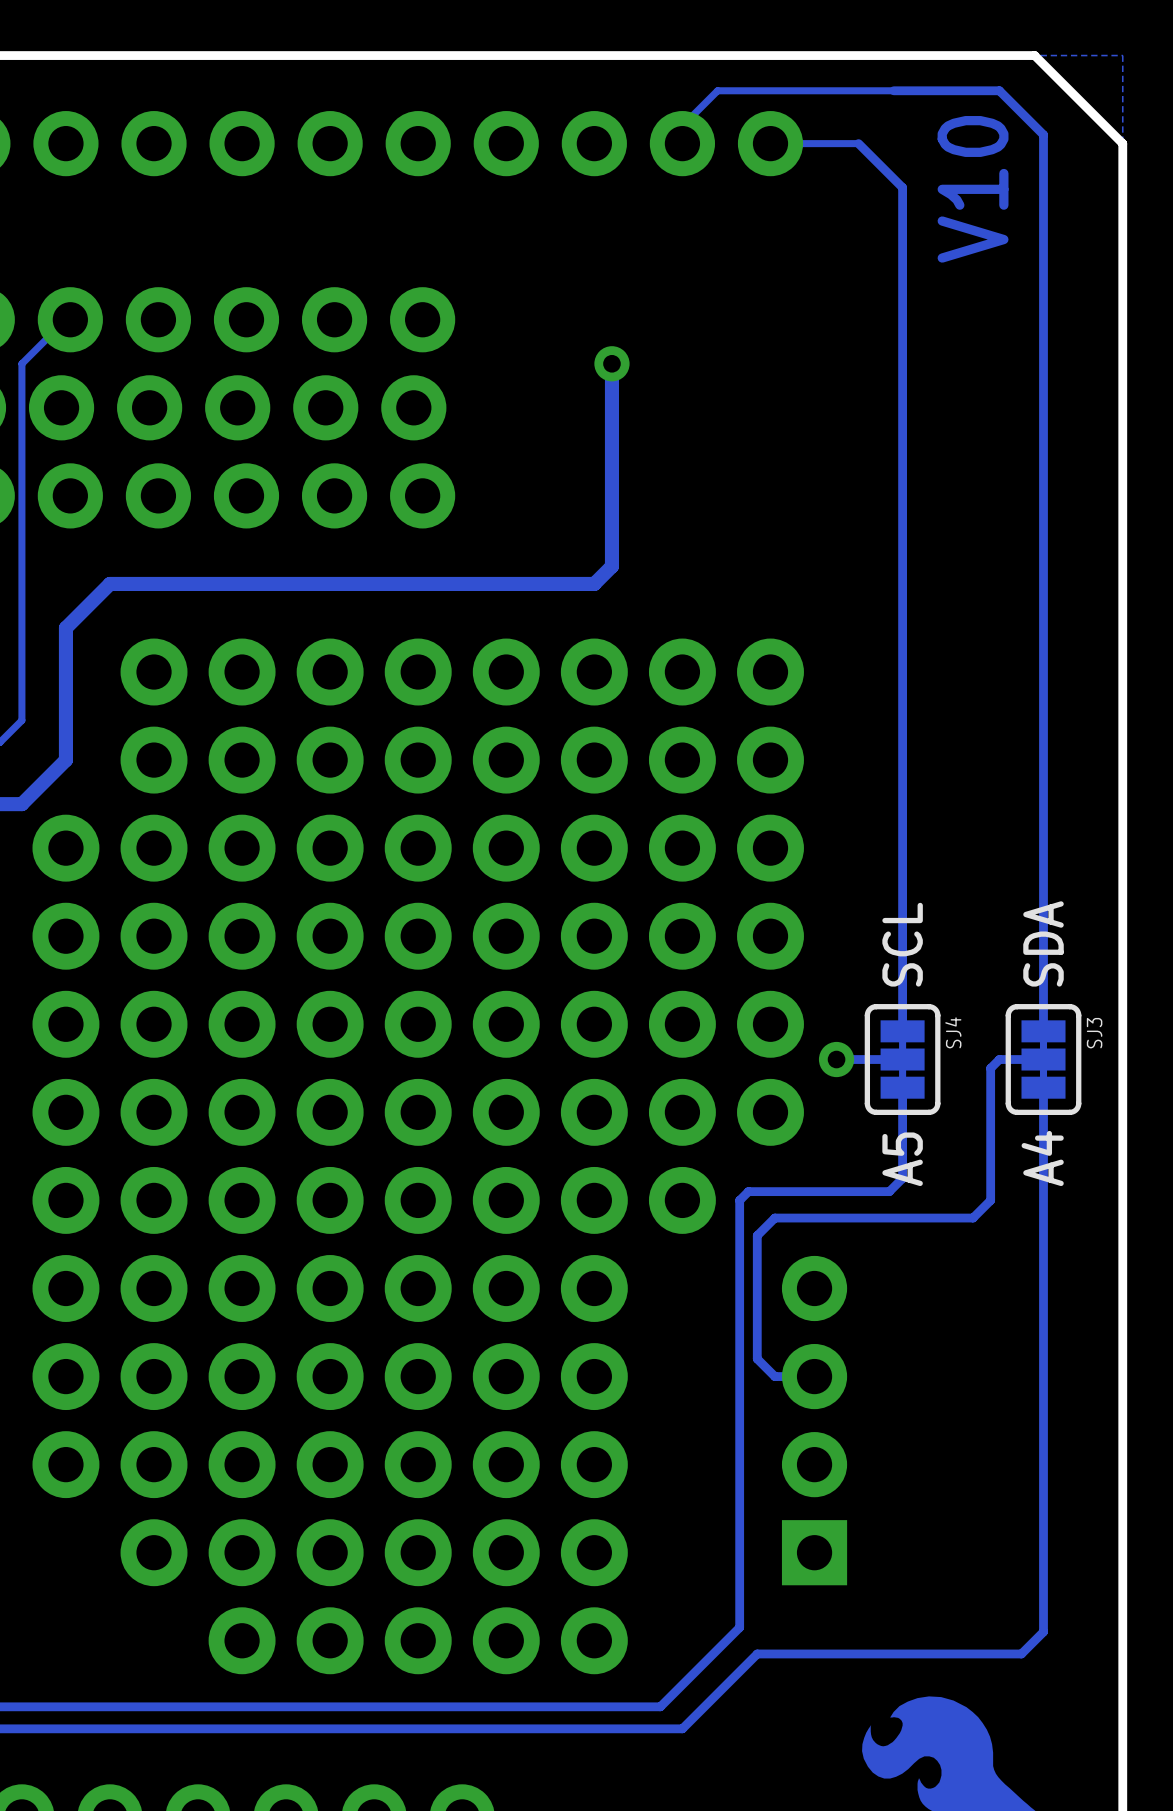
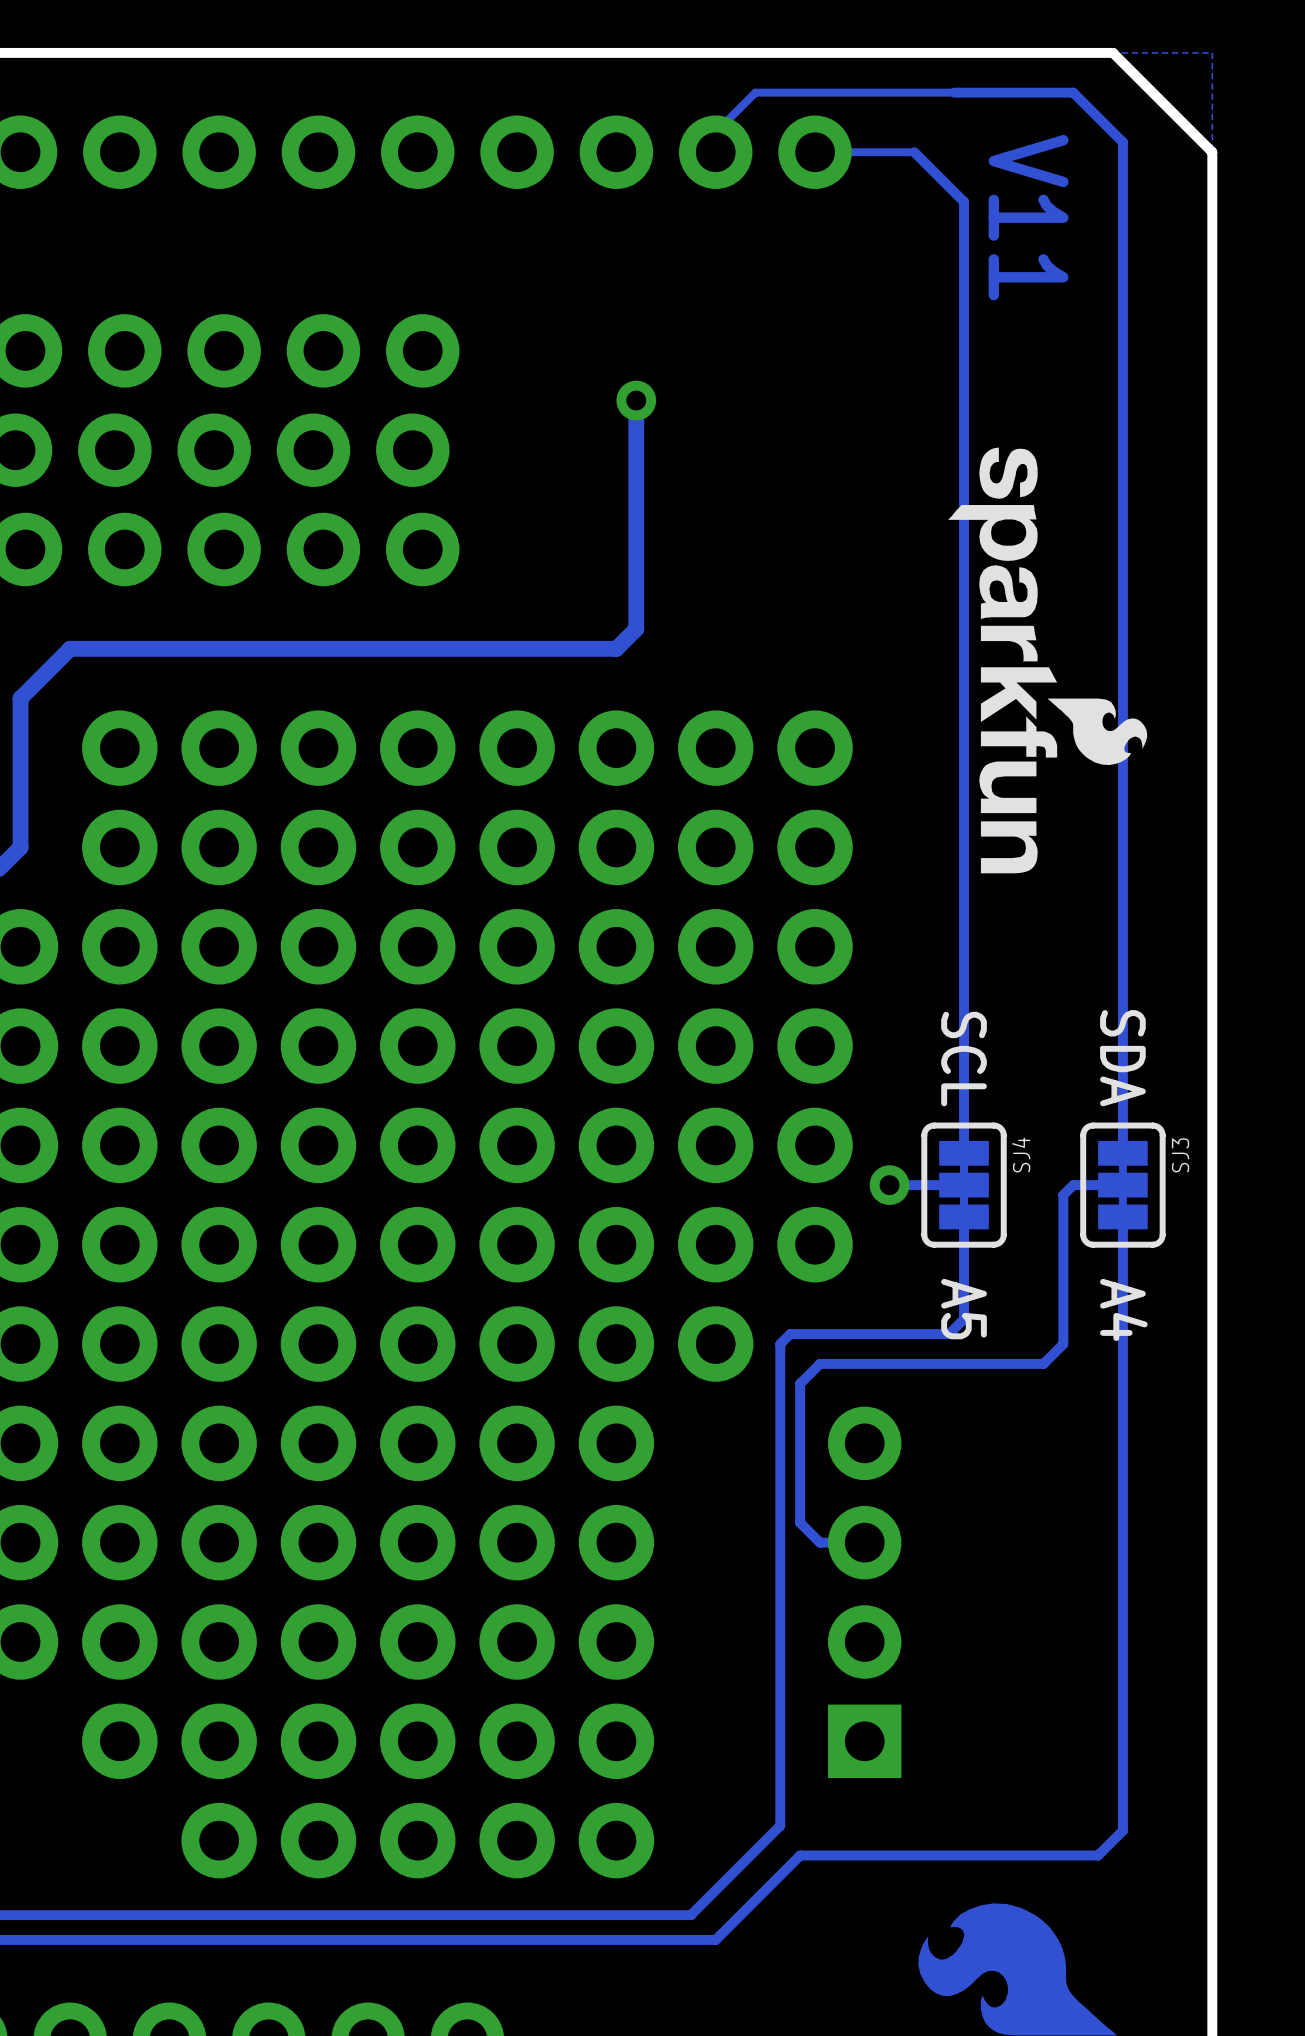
text: V10 (973, 189) -> V11 (1028, 217)
drawing: none -> [948, 447, 1148, 874]
text rotation: 0° (1043, 943) -> 180° (1122, 1058)
text rotation: 0° (902, 944) -> 180° (964, 1059)
text rotation: 0° (1042, 1158) -> 180° (1123, 1309)
text rotation: 0° (902, 1159) -> 180° (964, 1309)

